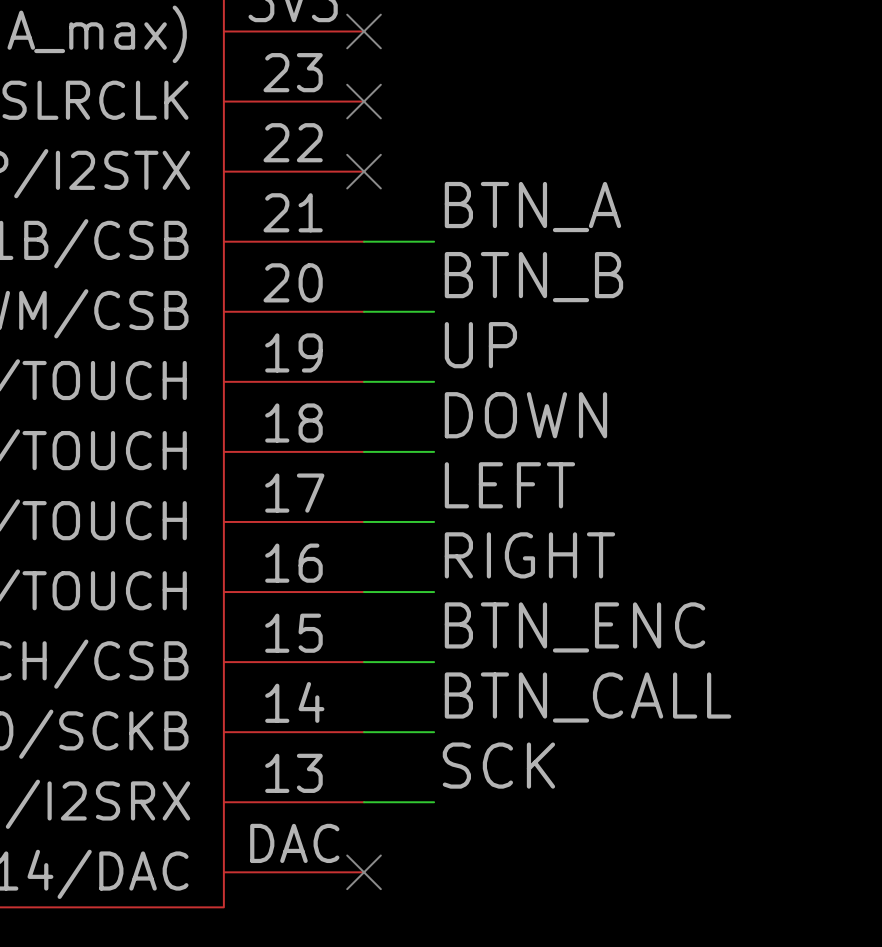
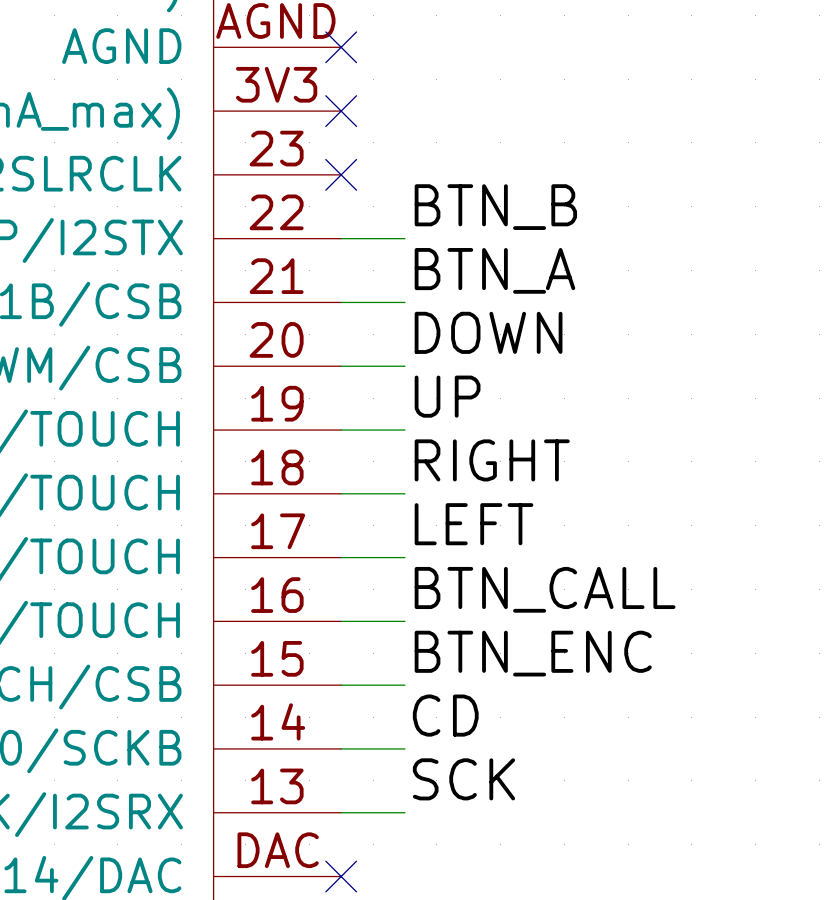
label: none -> BTN_B (495, 207)
wire: none -> (341, 238) (404, 238)
no-connect mark: (364, 171) -> none
label: BTN_B (533, 277) -> DOWN (488, 332)
label: DOWN (525, 415) -> RIGHT (492, 460)
label: RIGHT (529, 555) -> BTN_CALL (545, 589)
label: BTN_CALL (588, 697) -> CD (445, 715)

